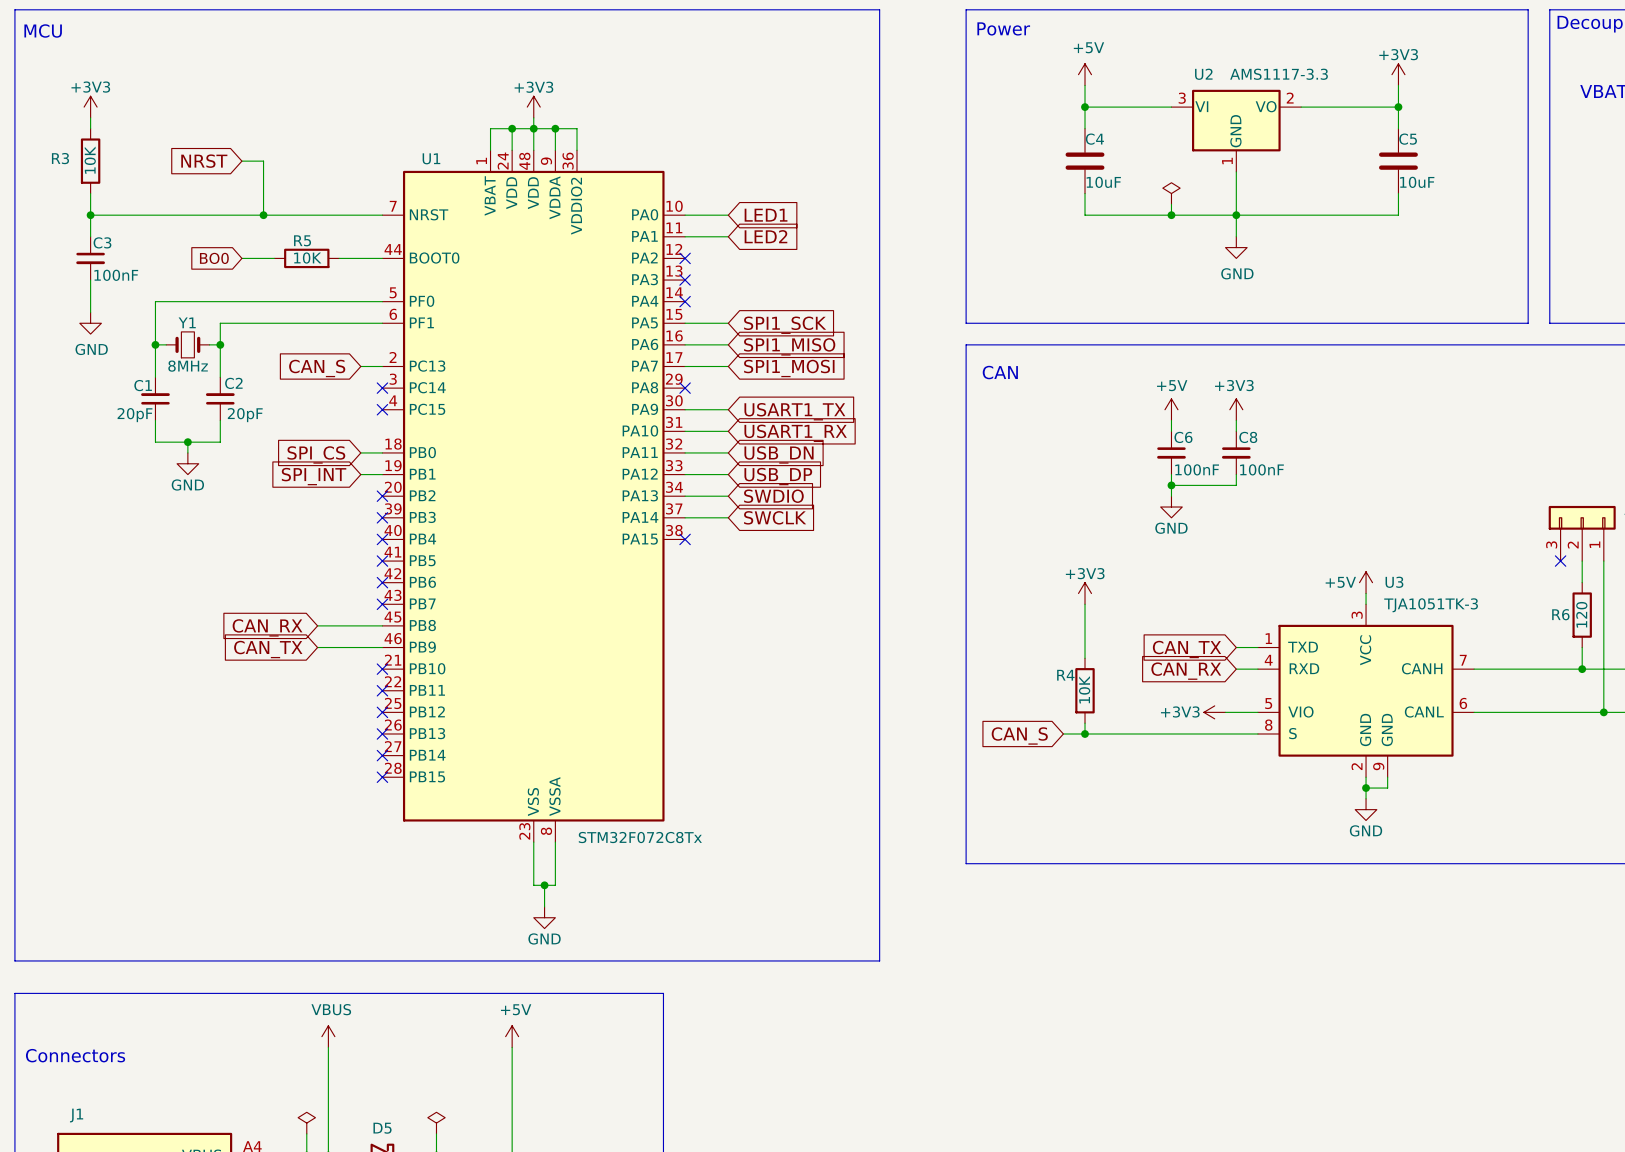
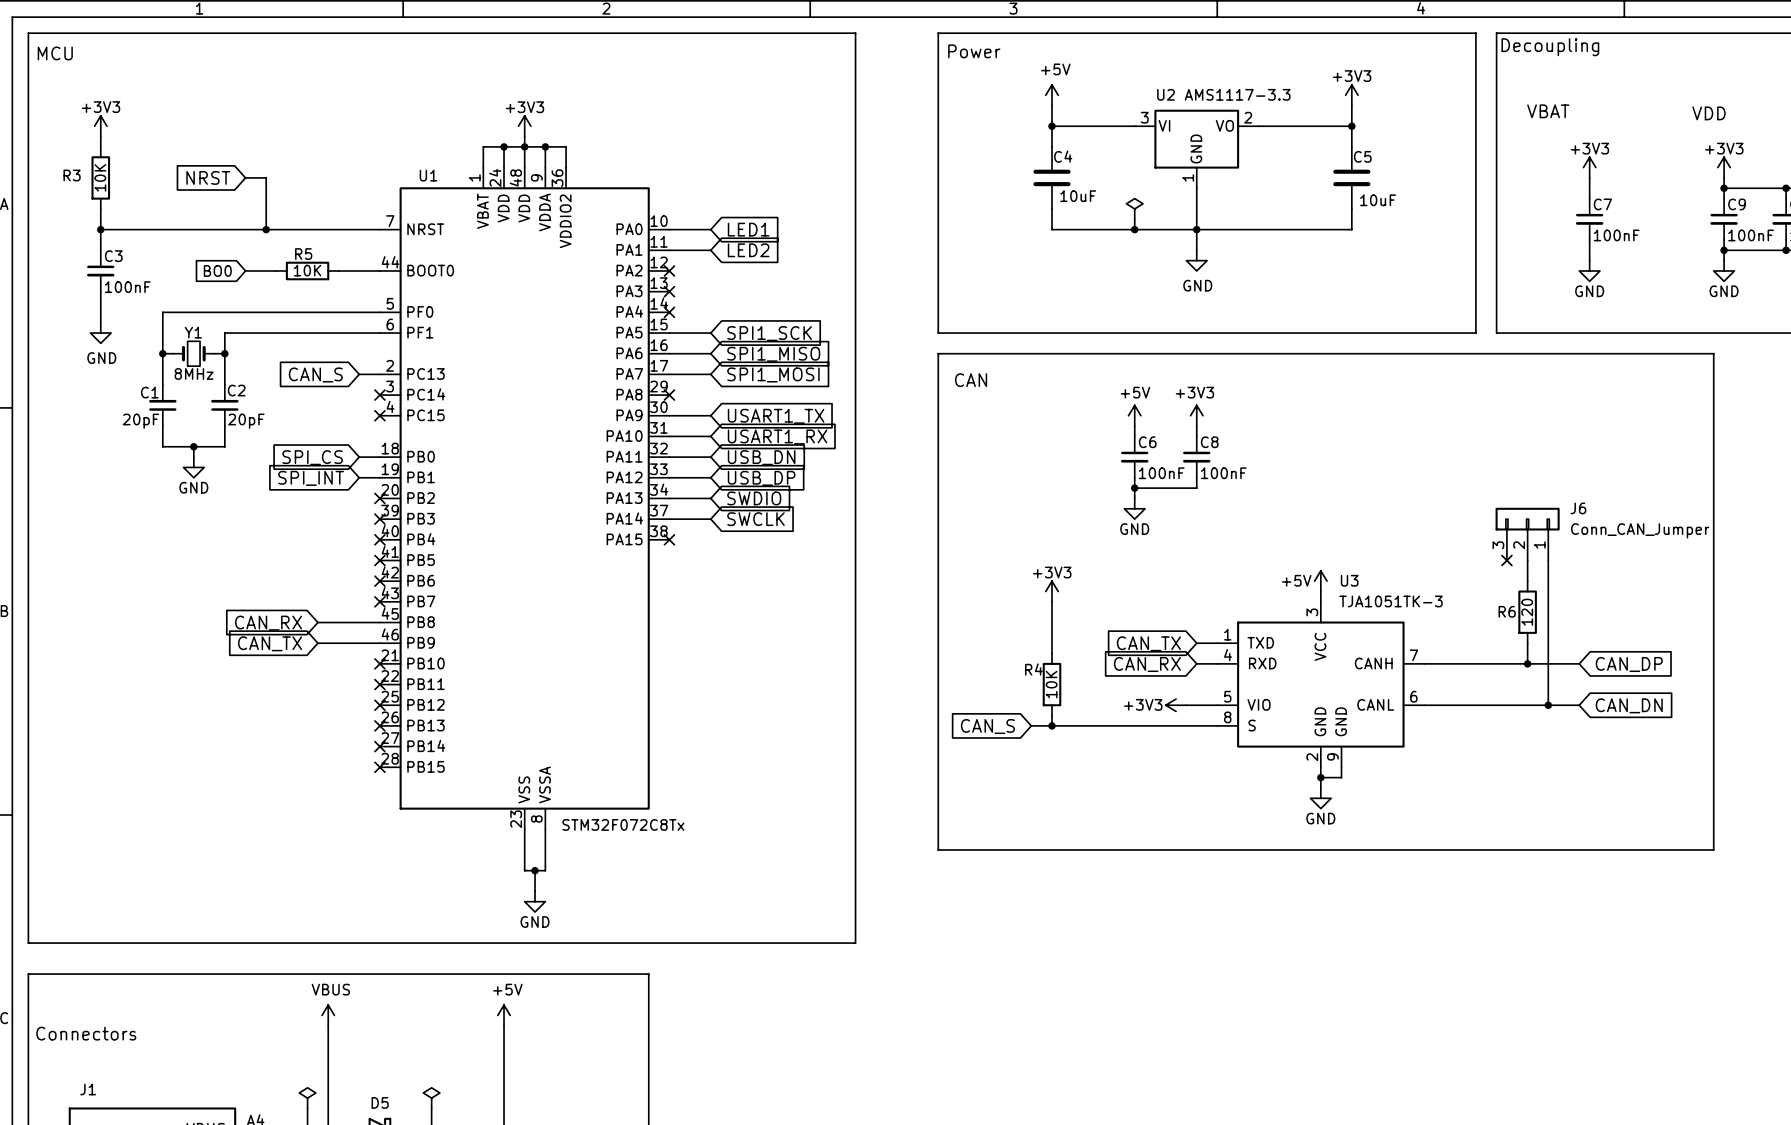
C4 value: none -> 10uF (1078, 196)
C4 text: 10uF (1103, 182) -> none
C5 text: 10uF (1417, 182) -> none
C5 value: none -> 10uF (1378, 200)

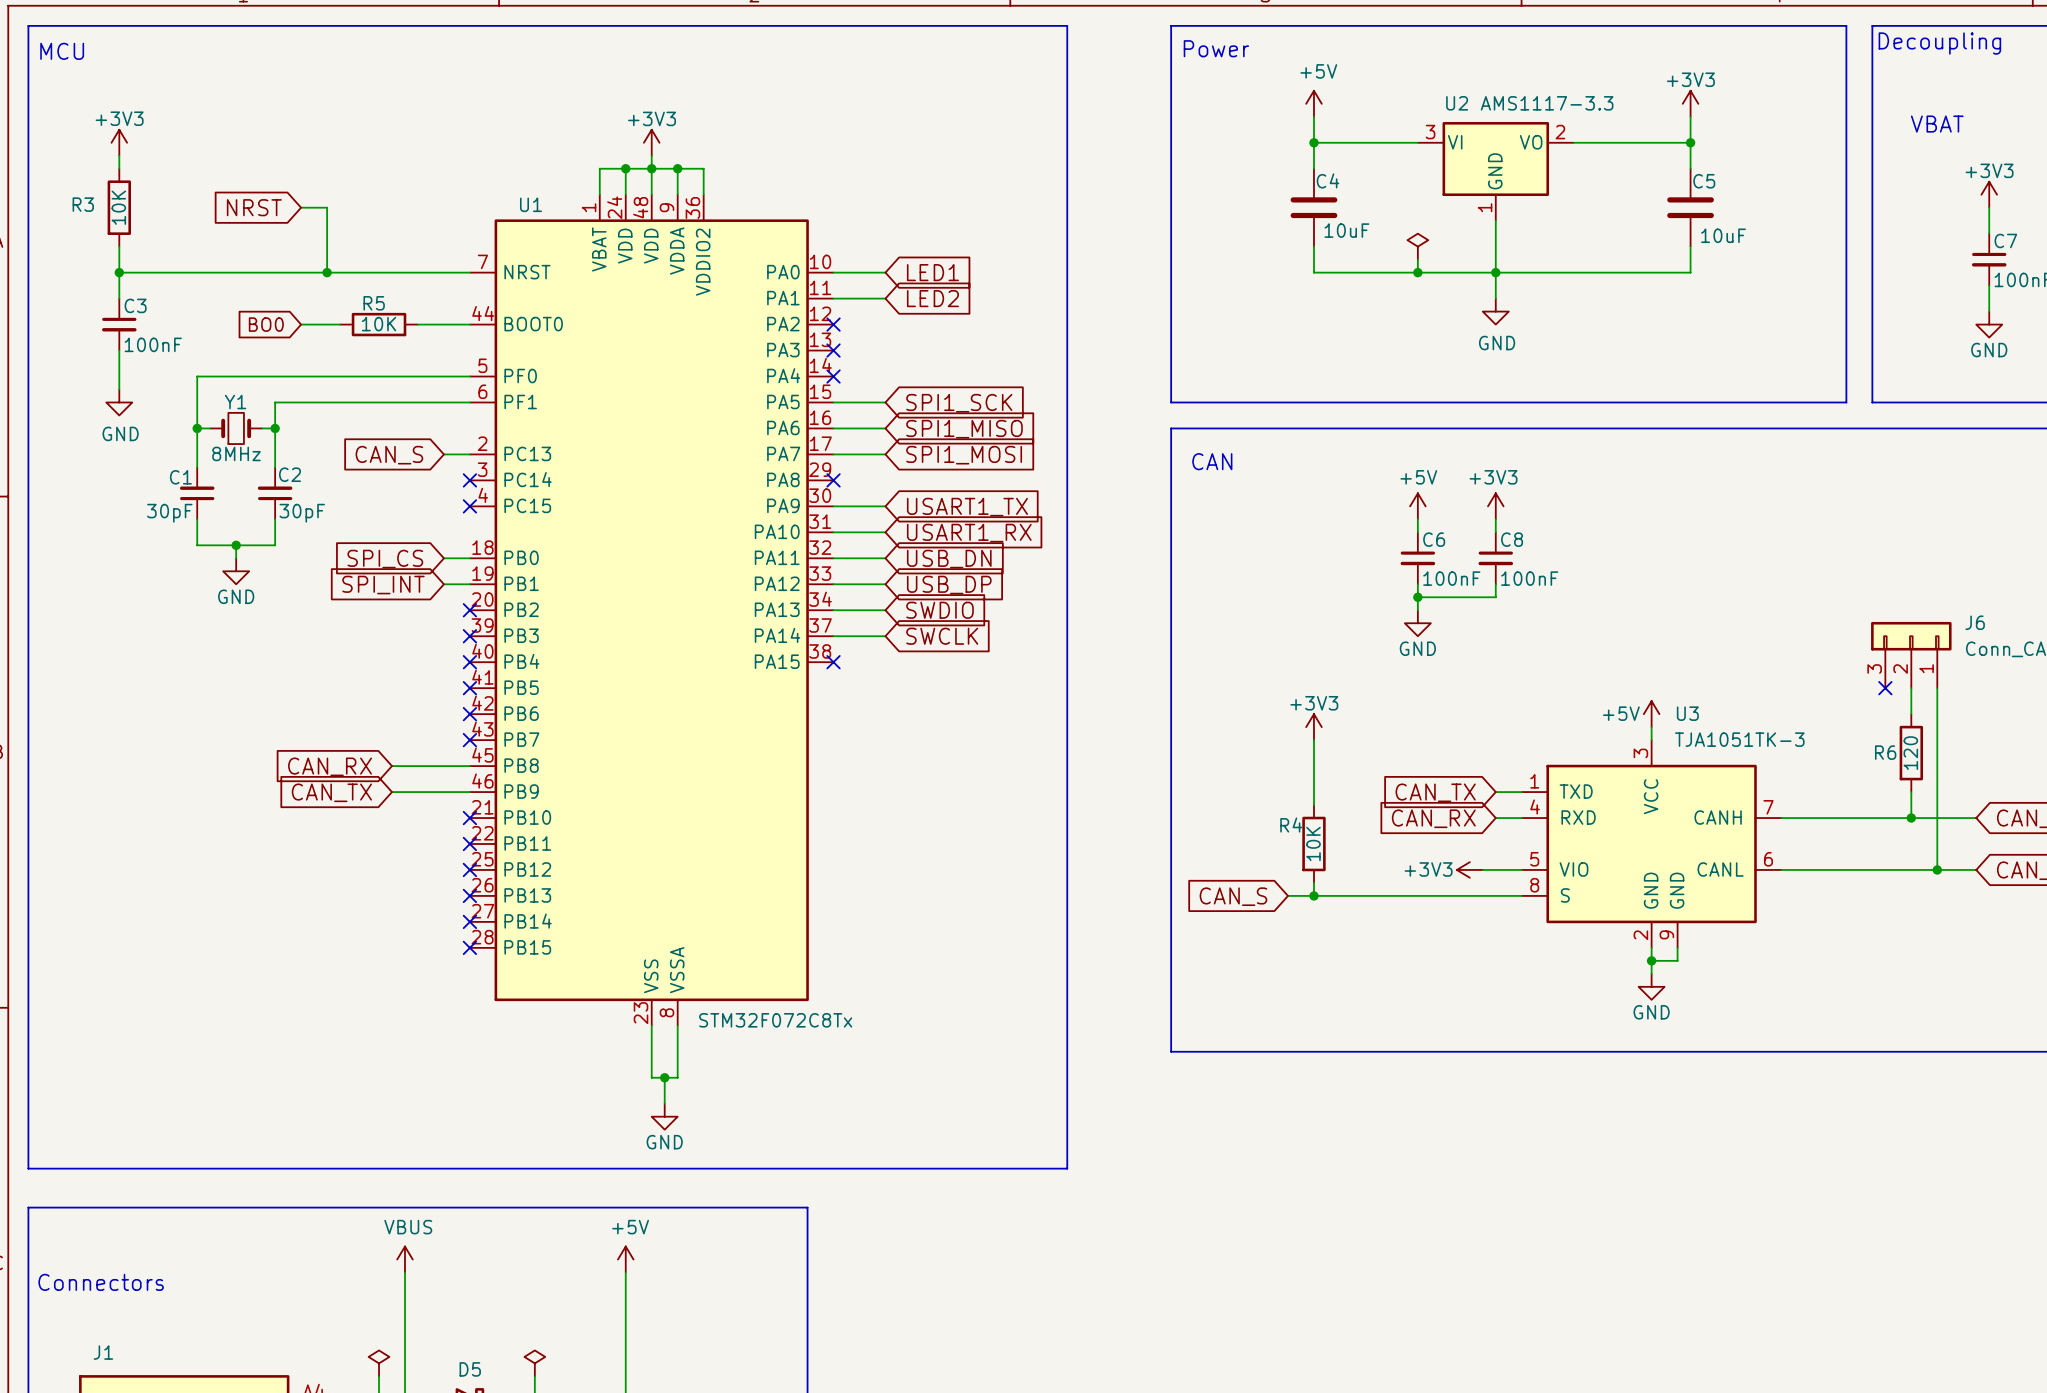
C1 value: 20pF (140, 421) -> 30pF (169, 513)
C2 value: 20pF (246, 421) -> 30pF (302, 513)

